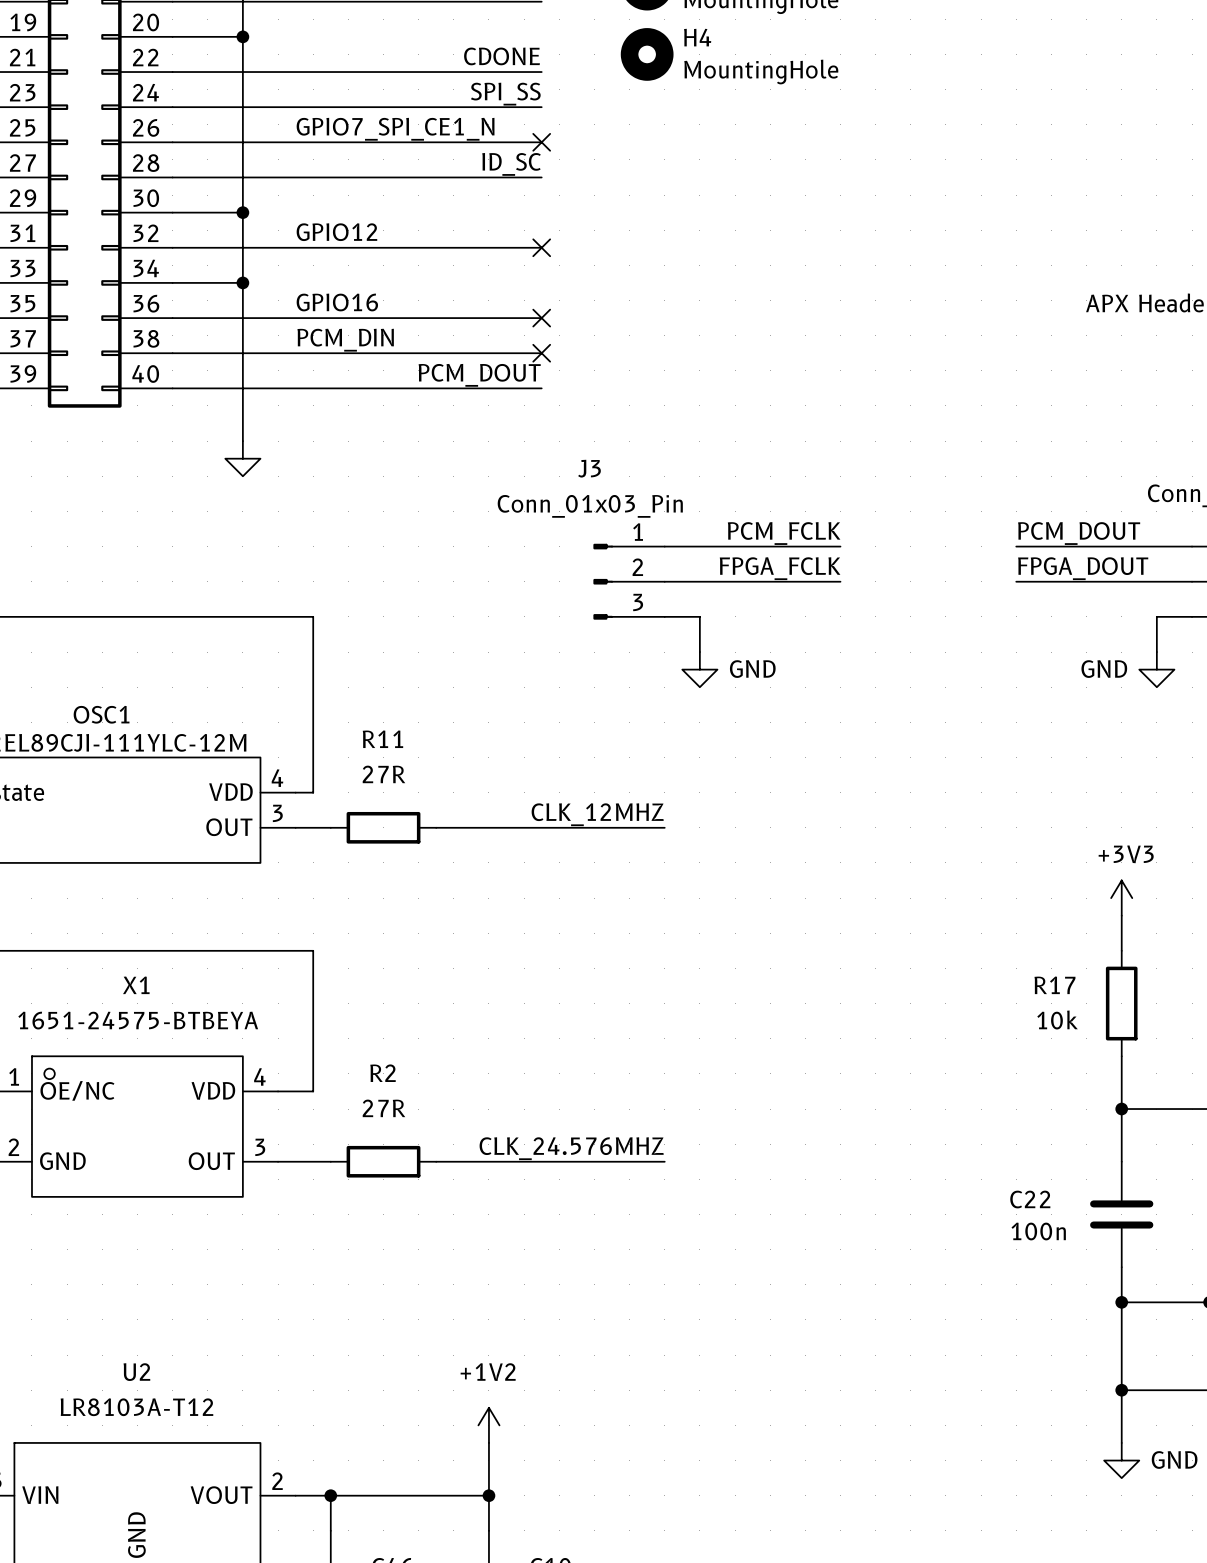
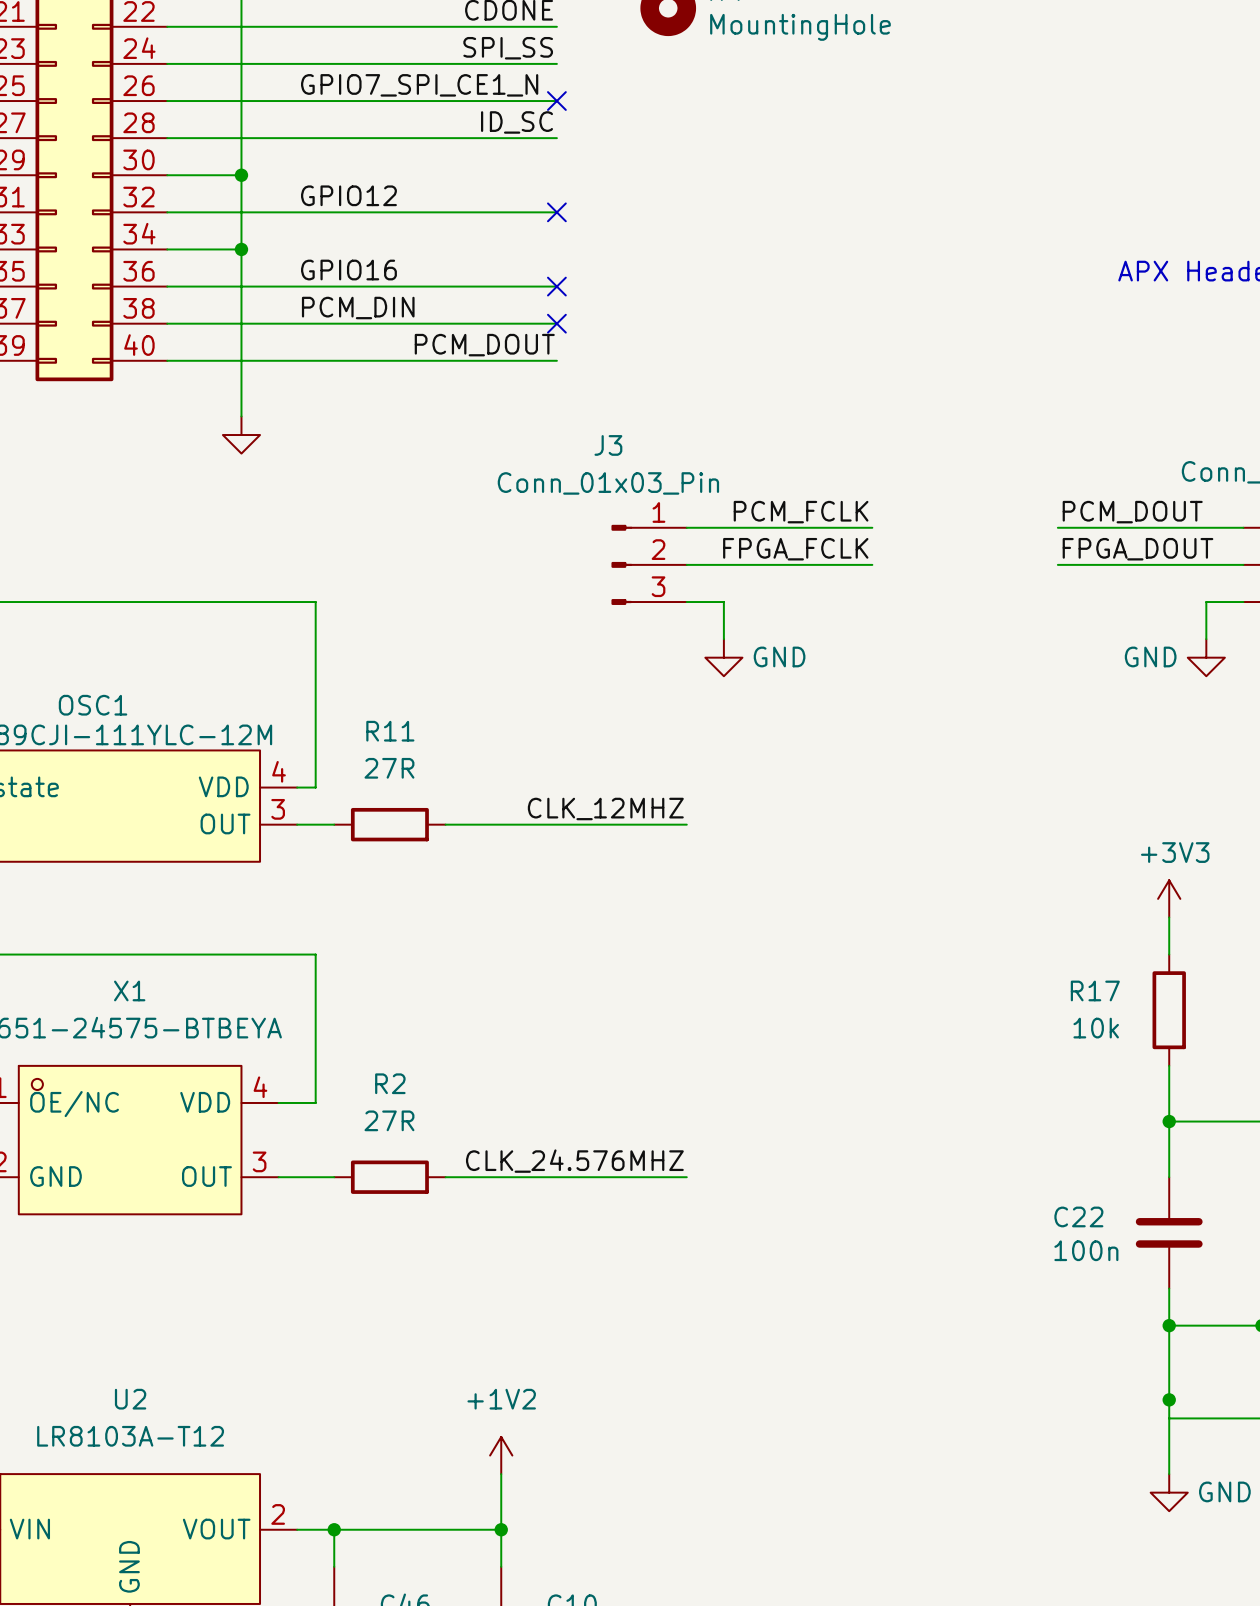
junction position: (1121, 1390) -> (1169, 1399)

